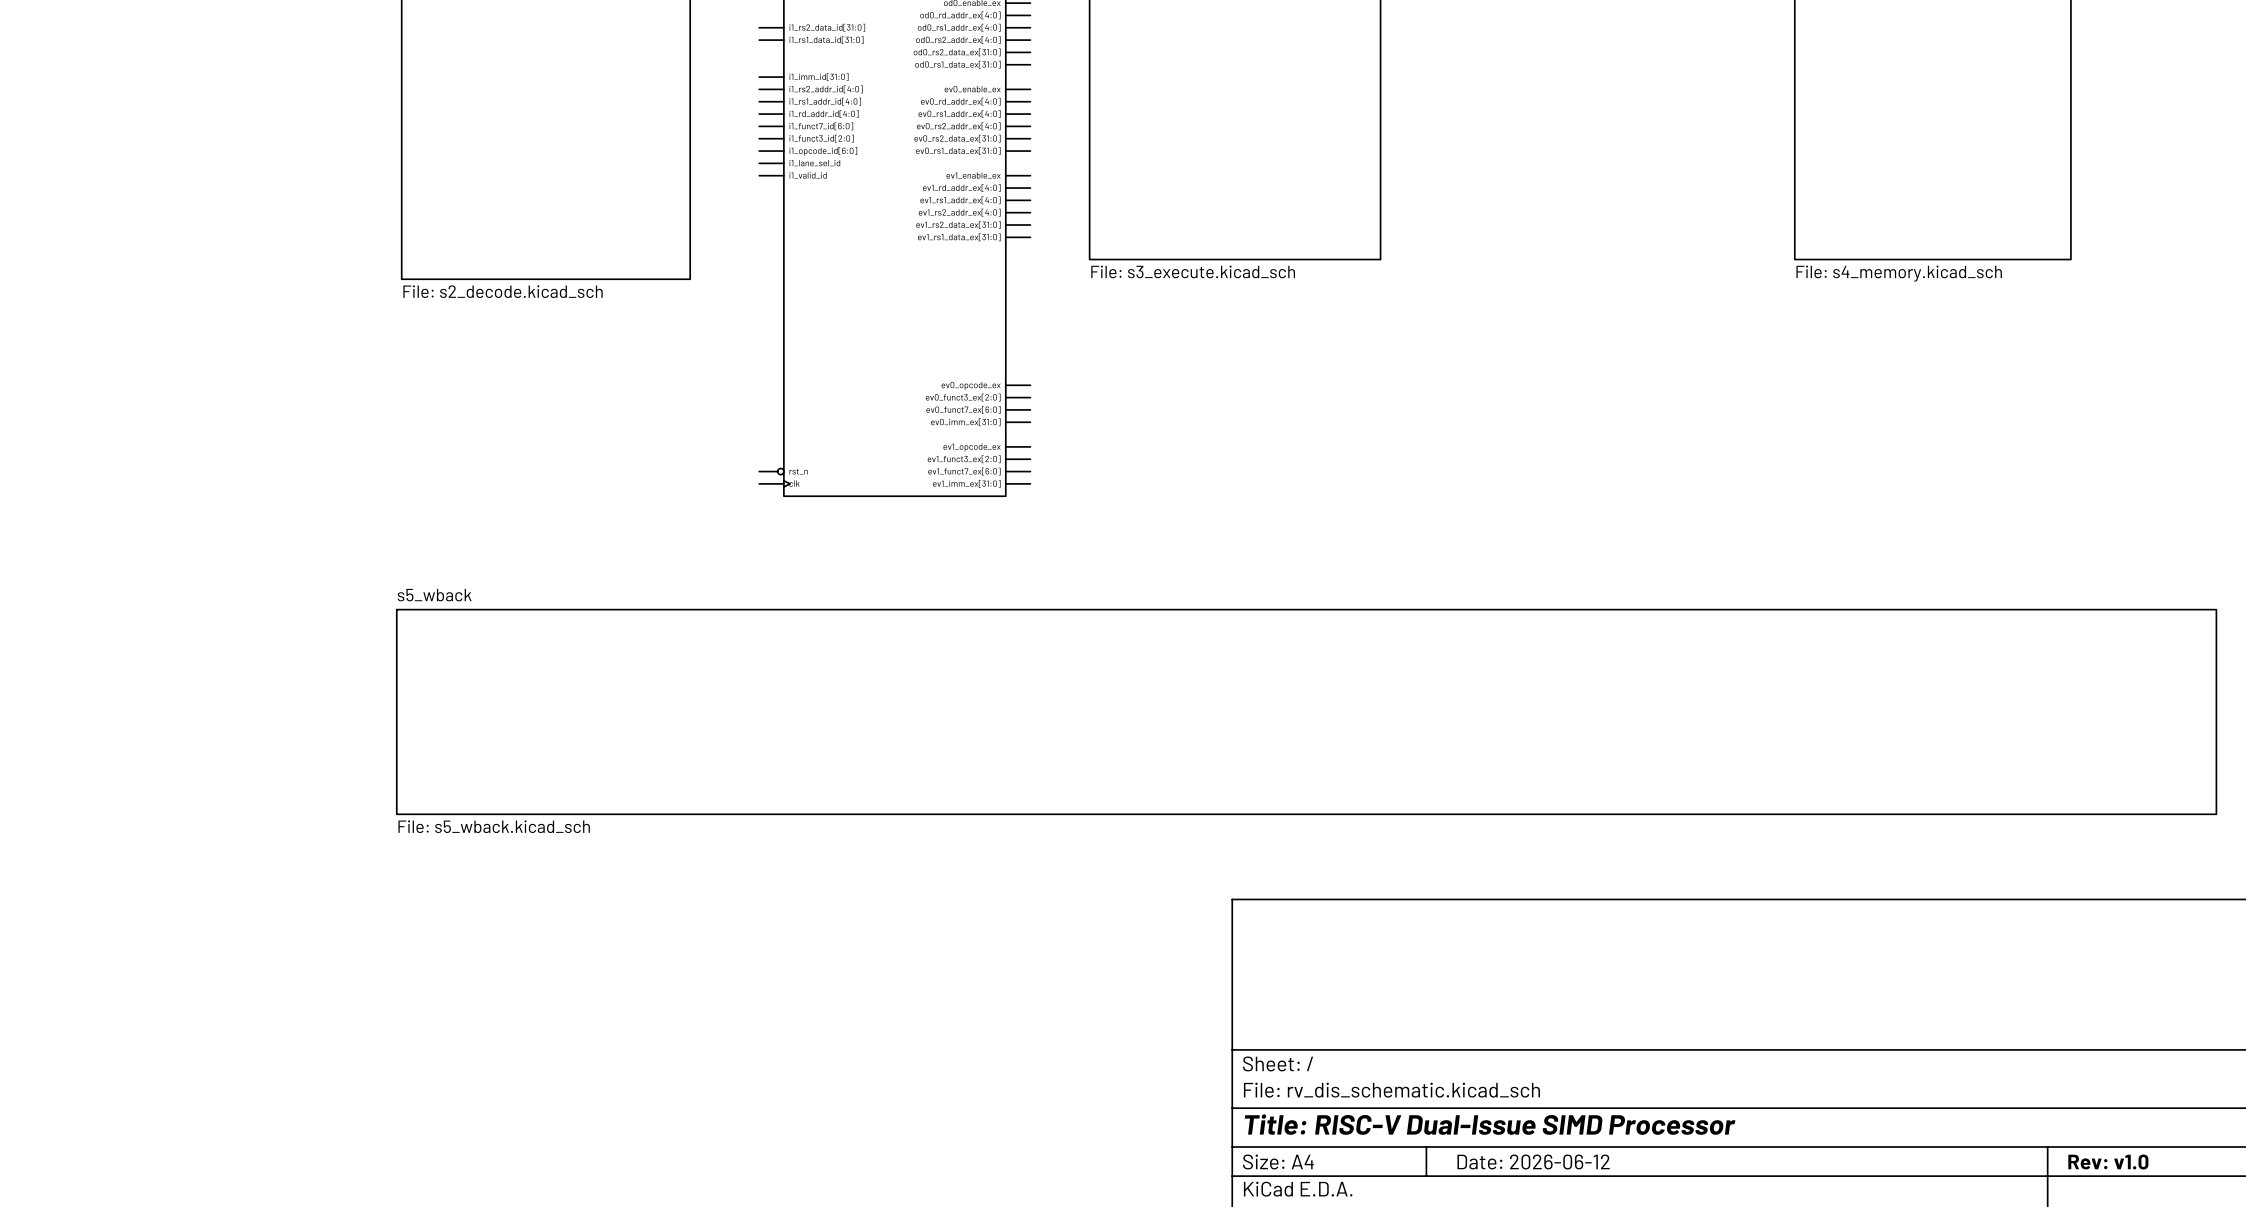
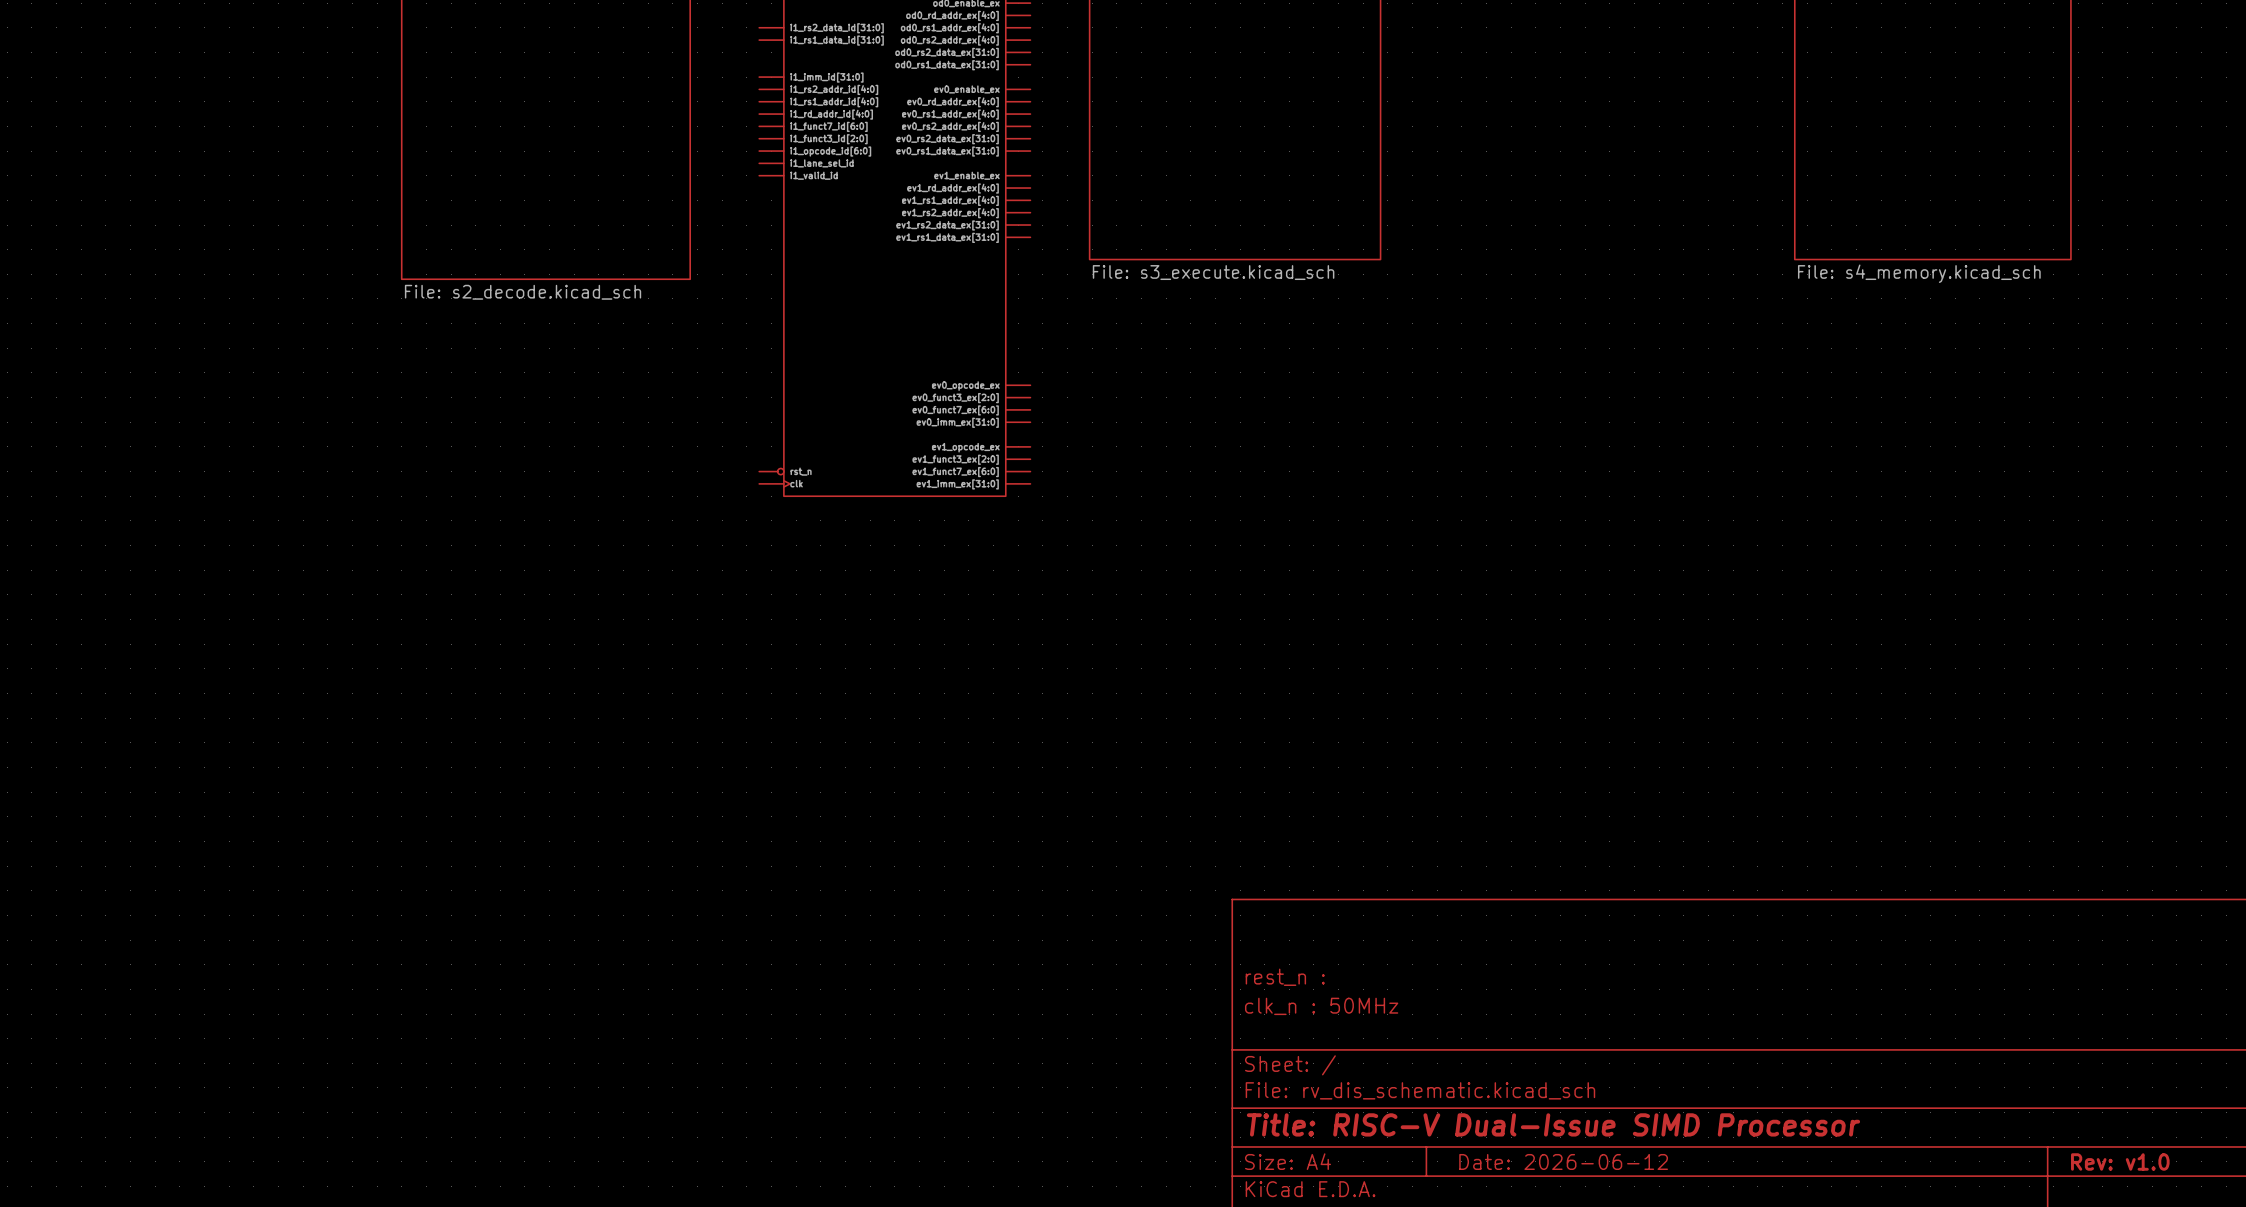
sheet s5_wback: File: s5_wback.kicad_sch (1306, 711) -> none
title block: none -> rest_n : (1285, 977)
title block: none -> clk_n : 50MHz (1321, 1006)

